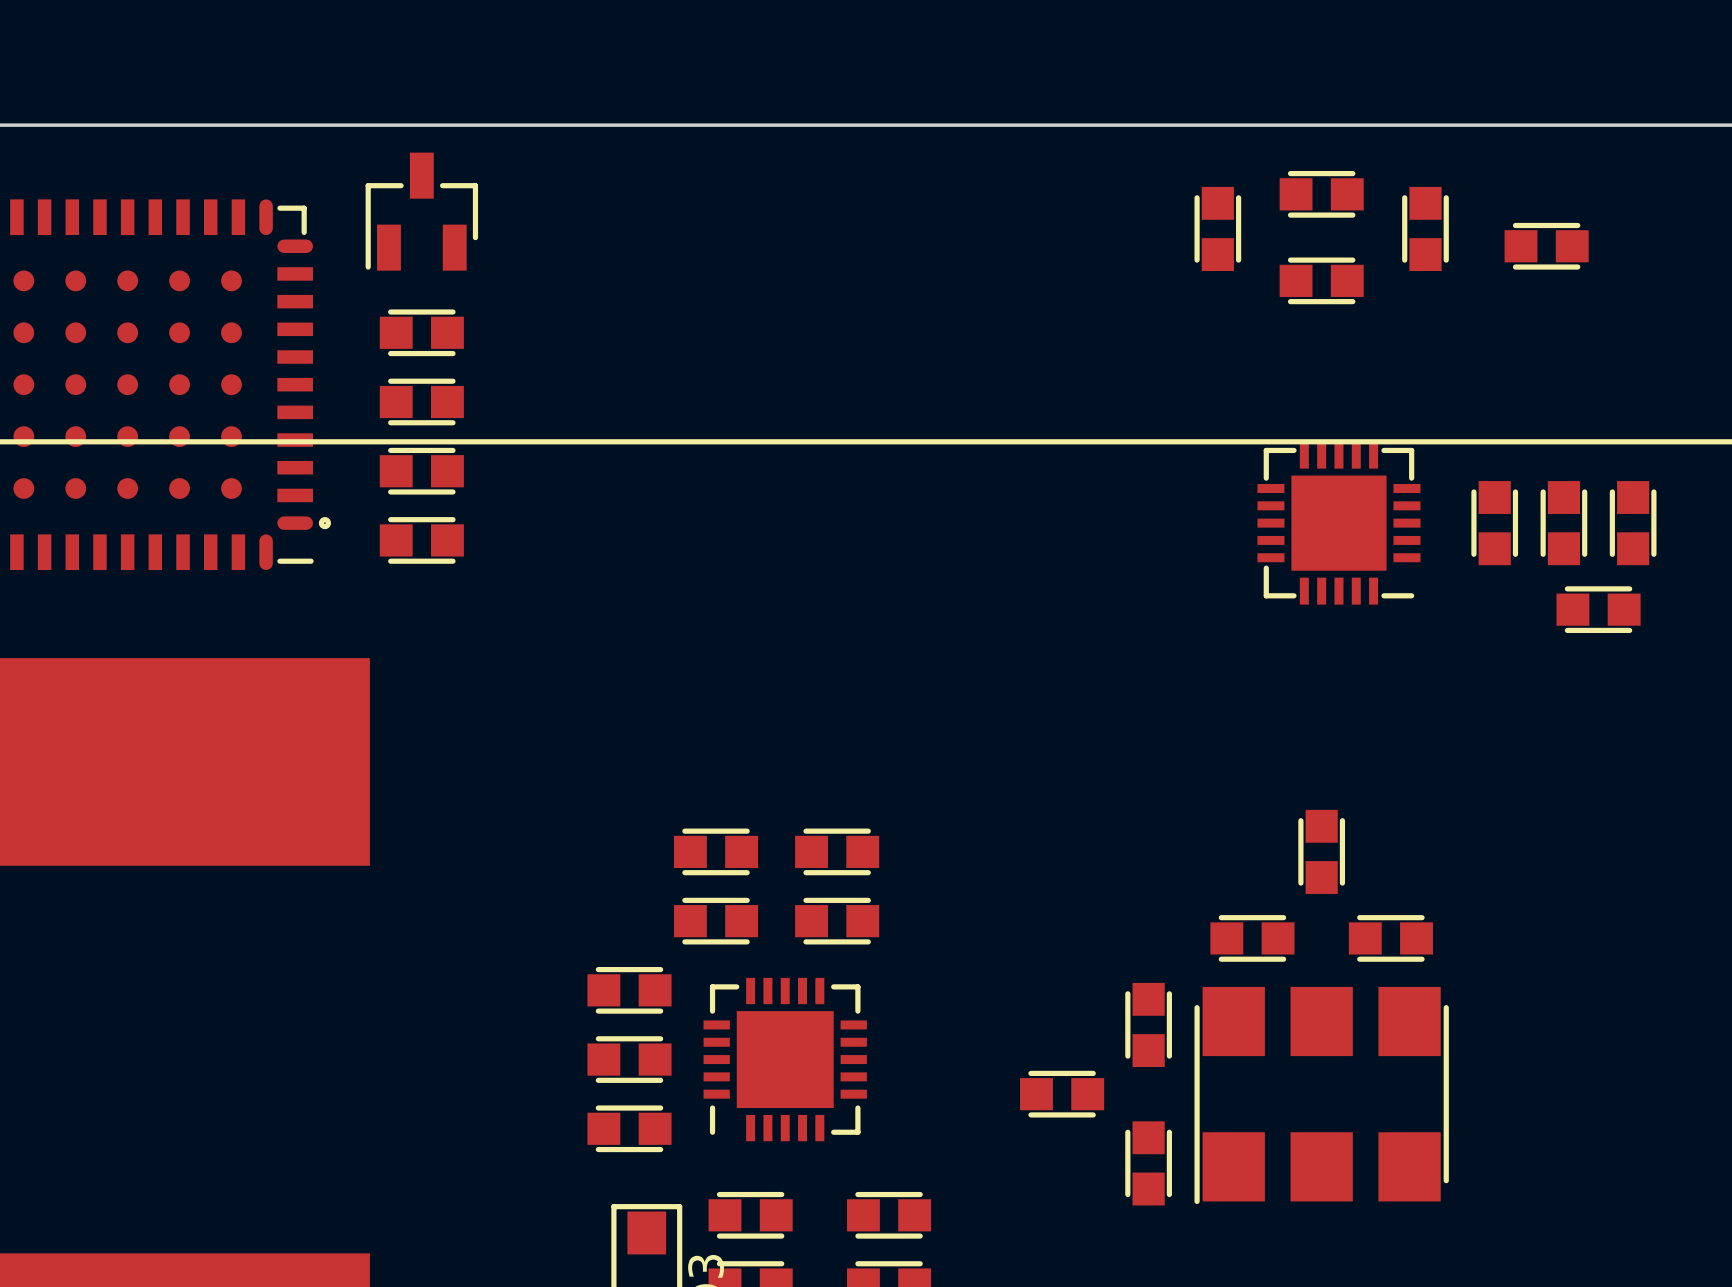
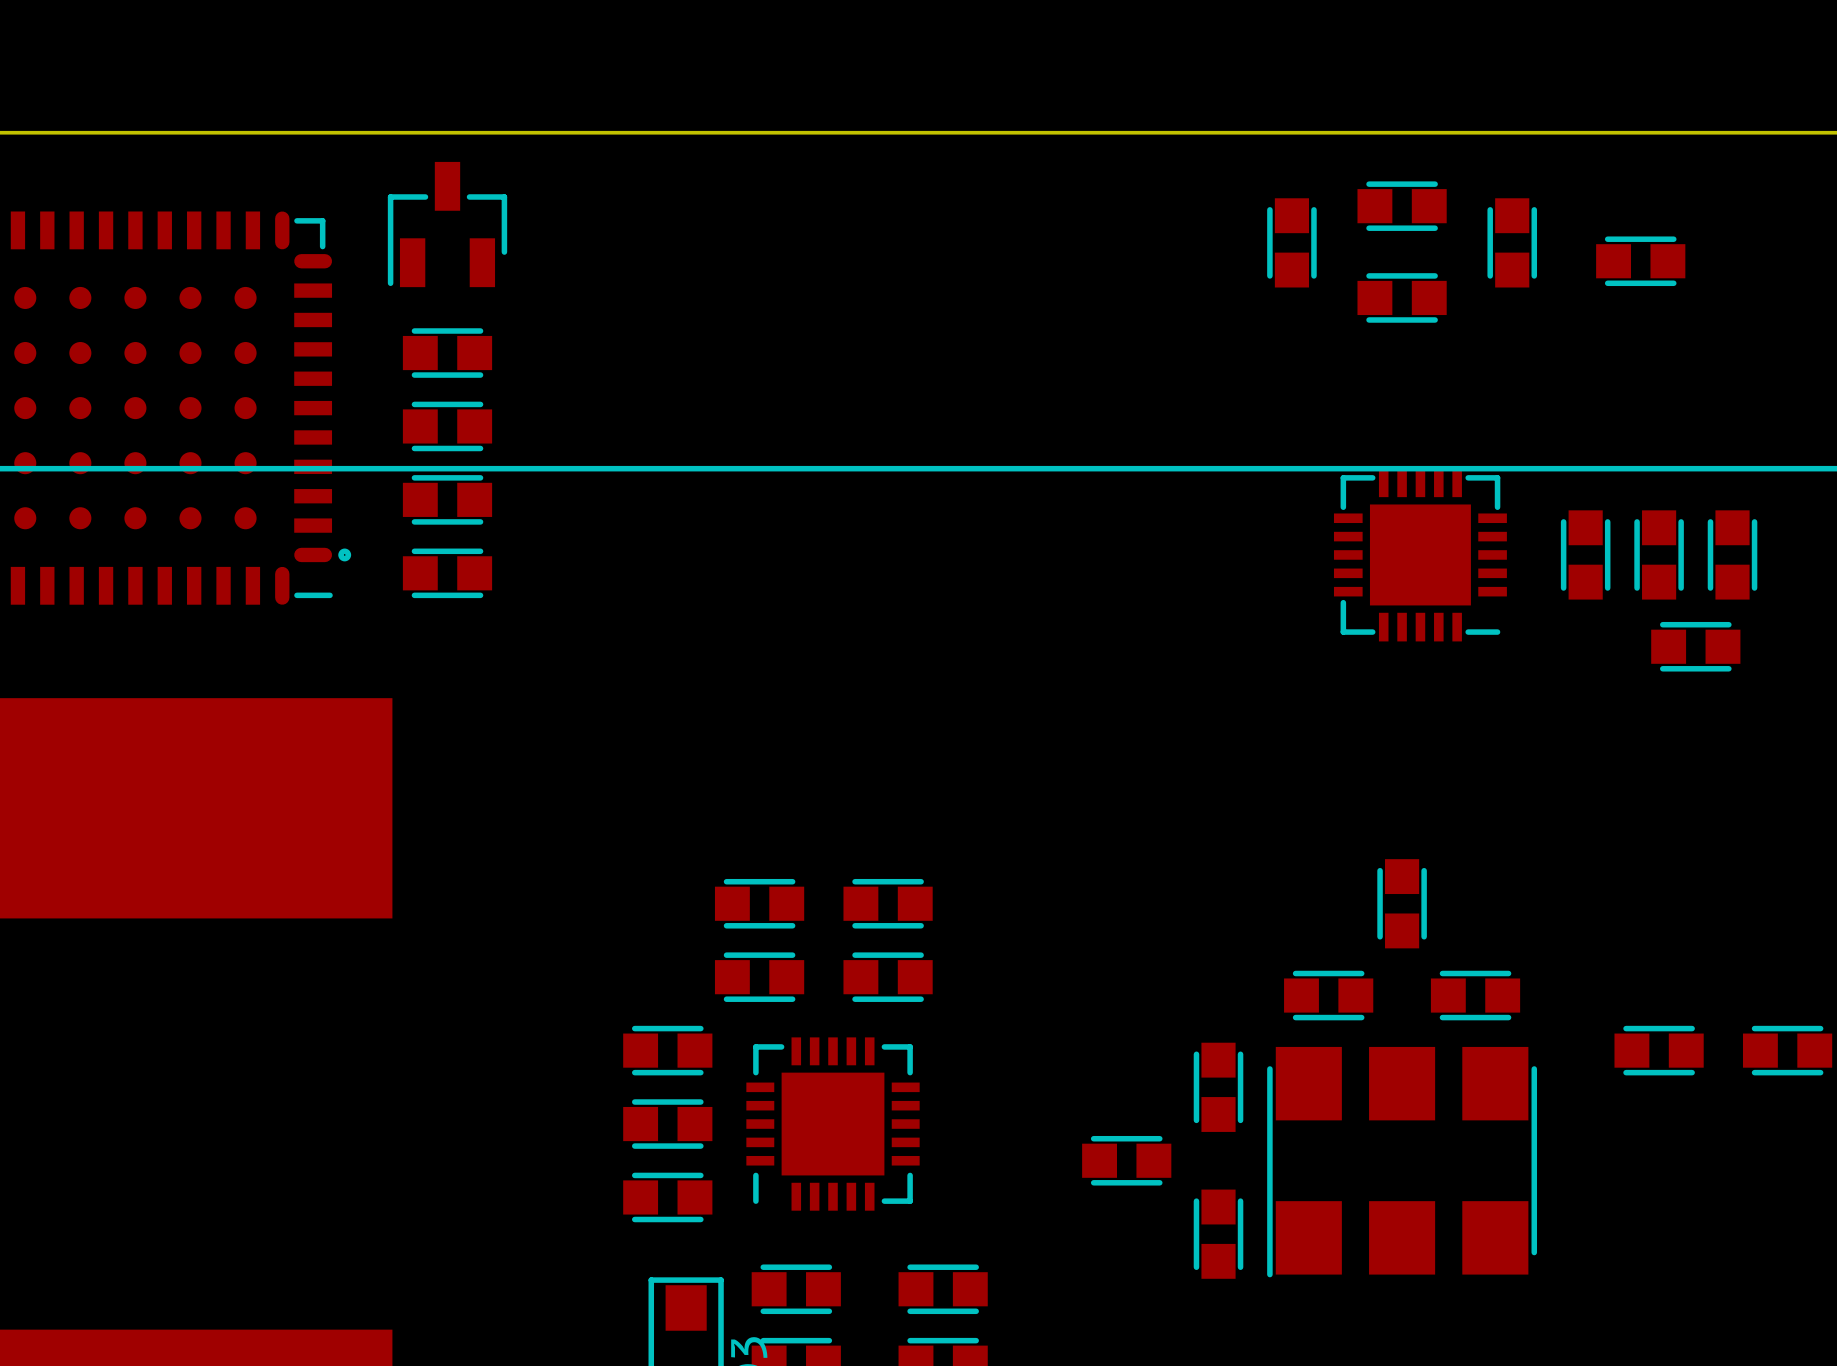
part: none -> (1659, 1050)
part: none -> (1787, 1050)

